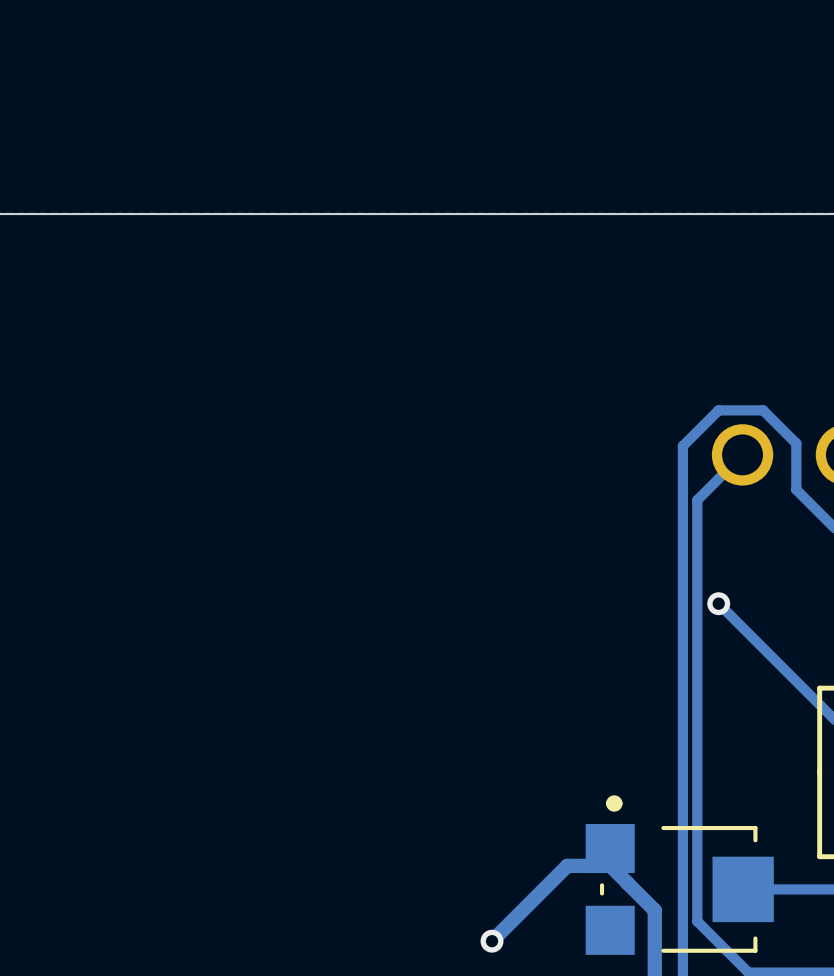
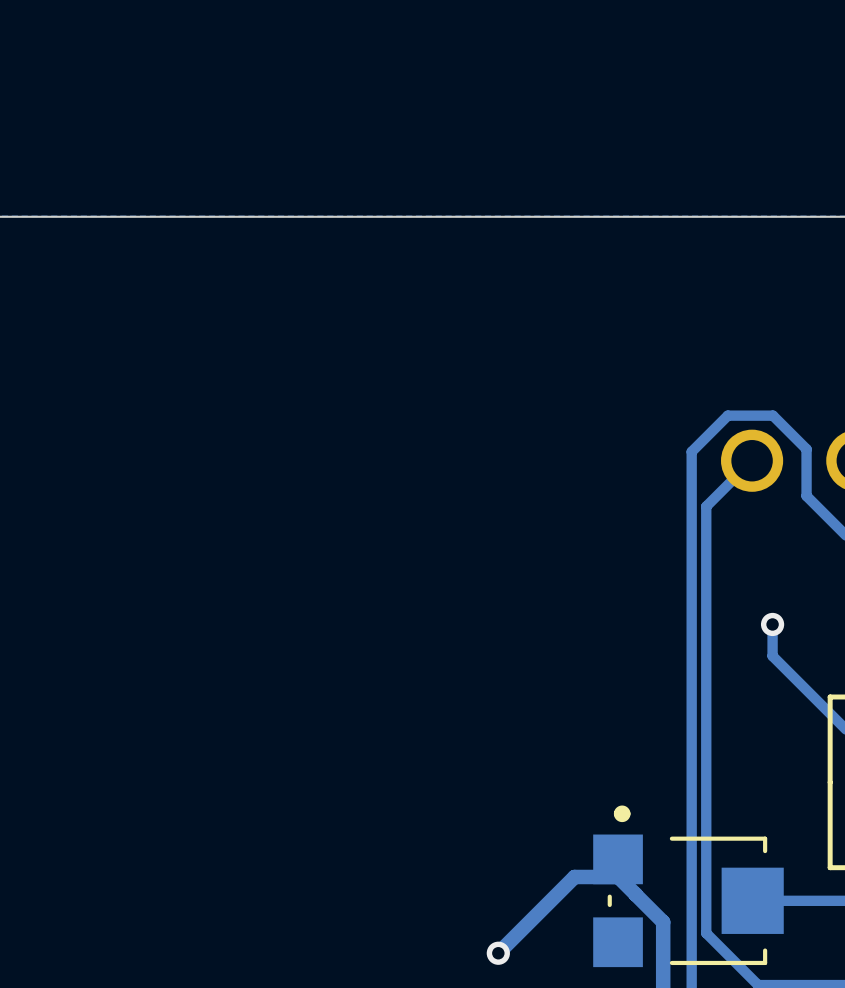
track: (718, 603) (762, 647) -> (772, 624) (772, 656)
via position: (718, 603) -> (772, 624)

